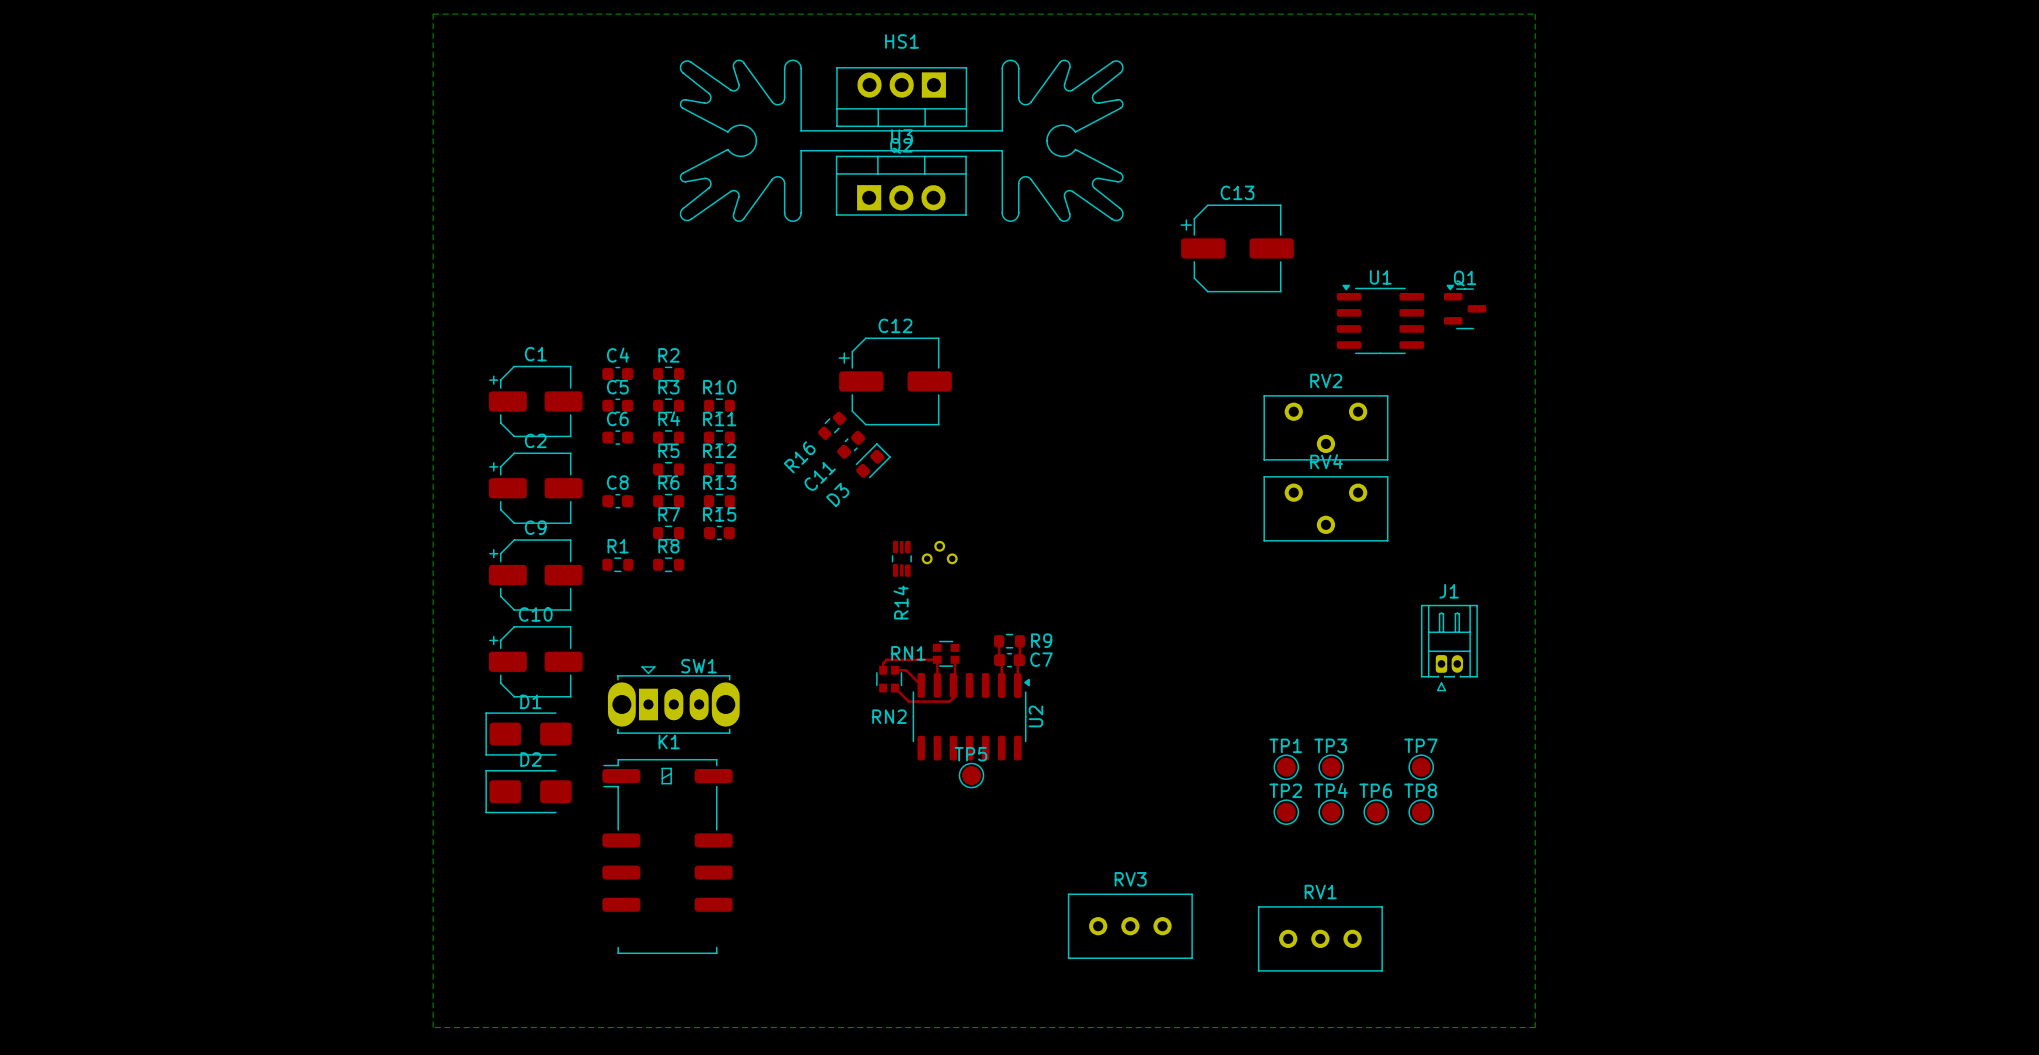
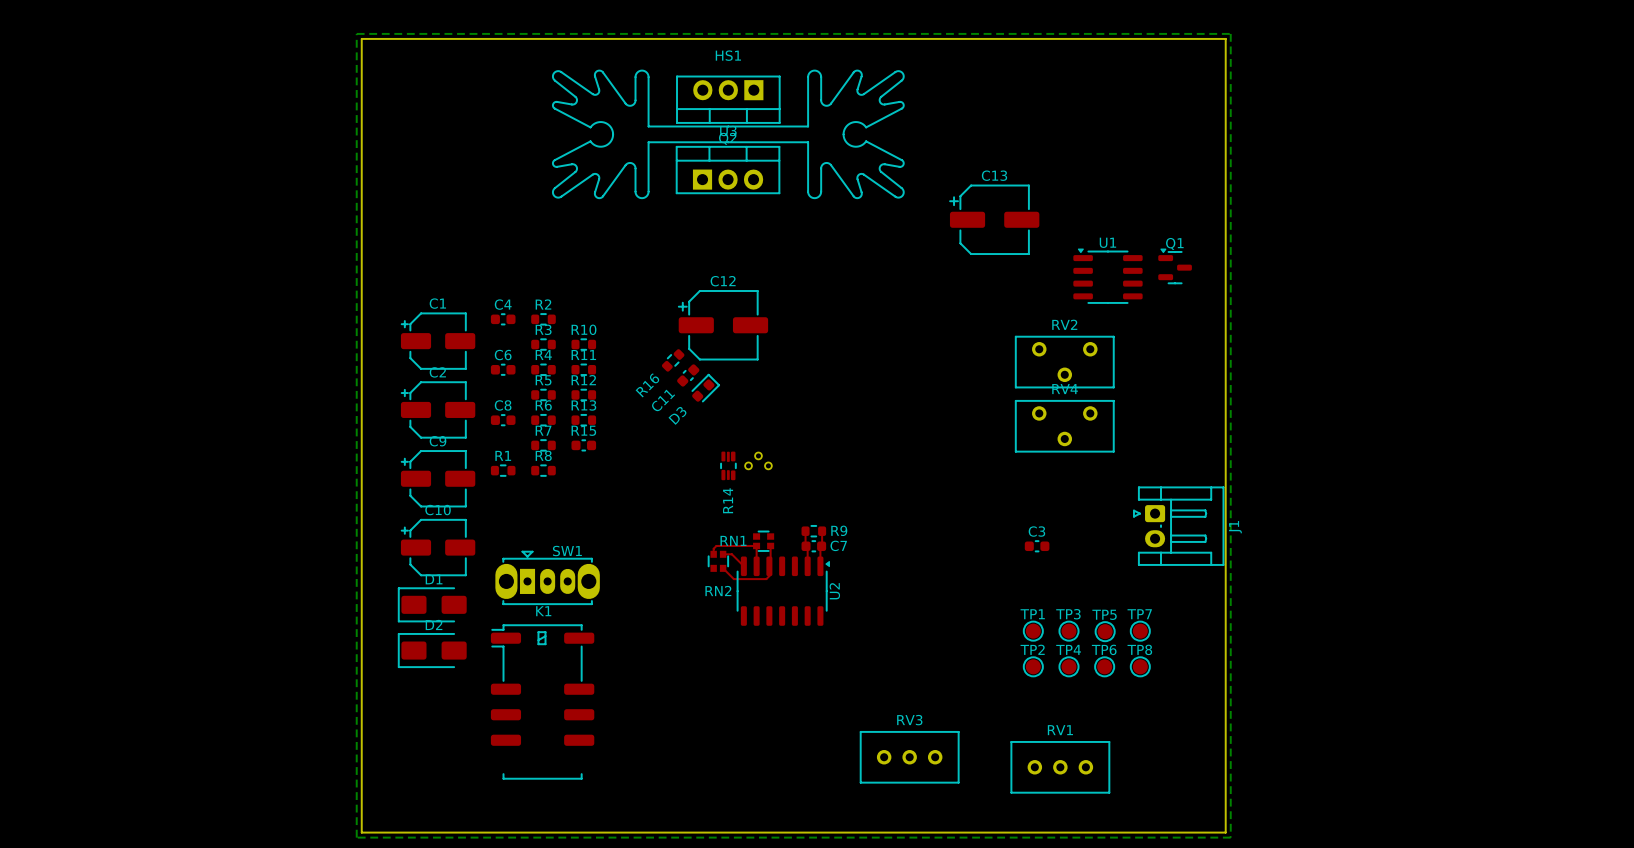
board edge: none -> (361, 38) (1225, 38) (1225, 832) (361, 832) (361, 38)
C5: (617, 405) -> none
J1 name position: J1 (1449, 591) -> J1 (1235, 527)
J1 footprint: [1420, 604, 1478, 692] -> [1133, 486, 1225, 566]
C3: none -> (1037, 546)
TP5 position: (971, 775) -> (1105, 631)

